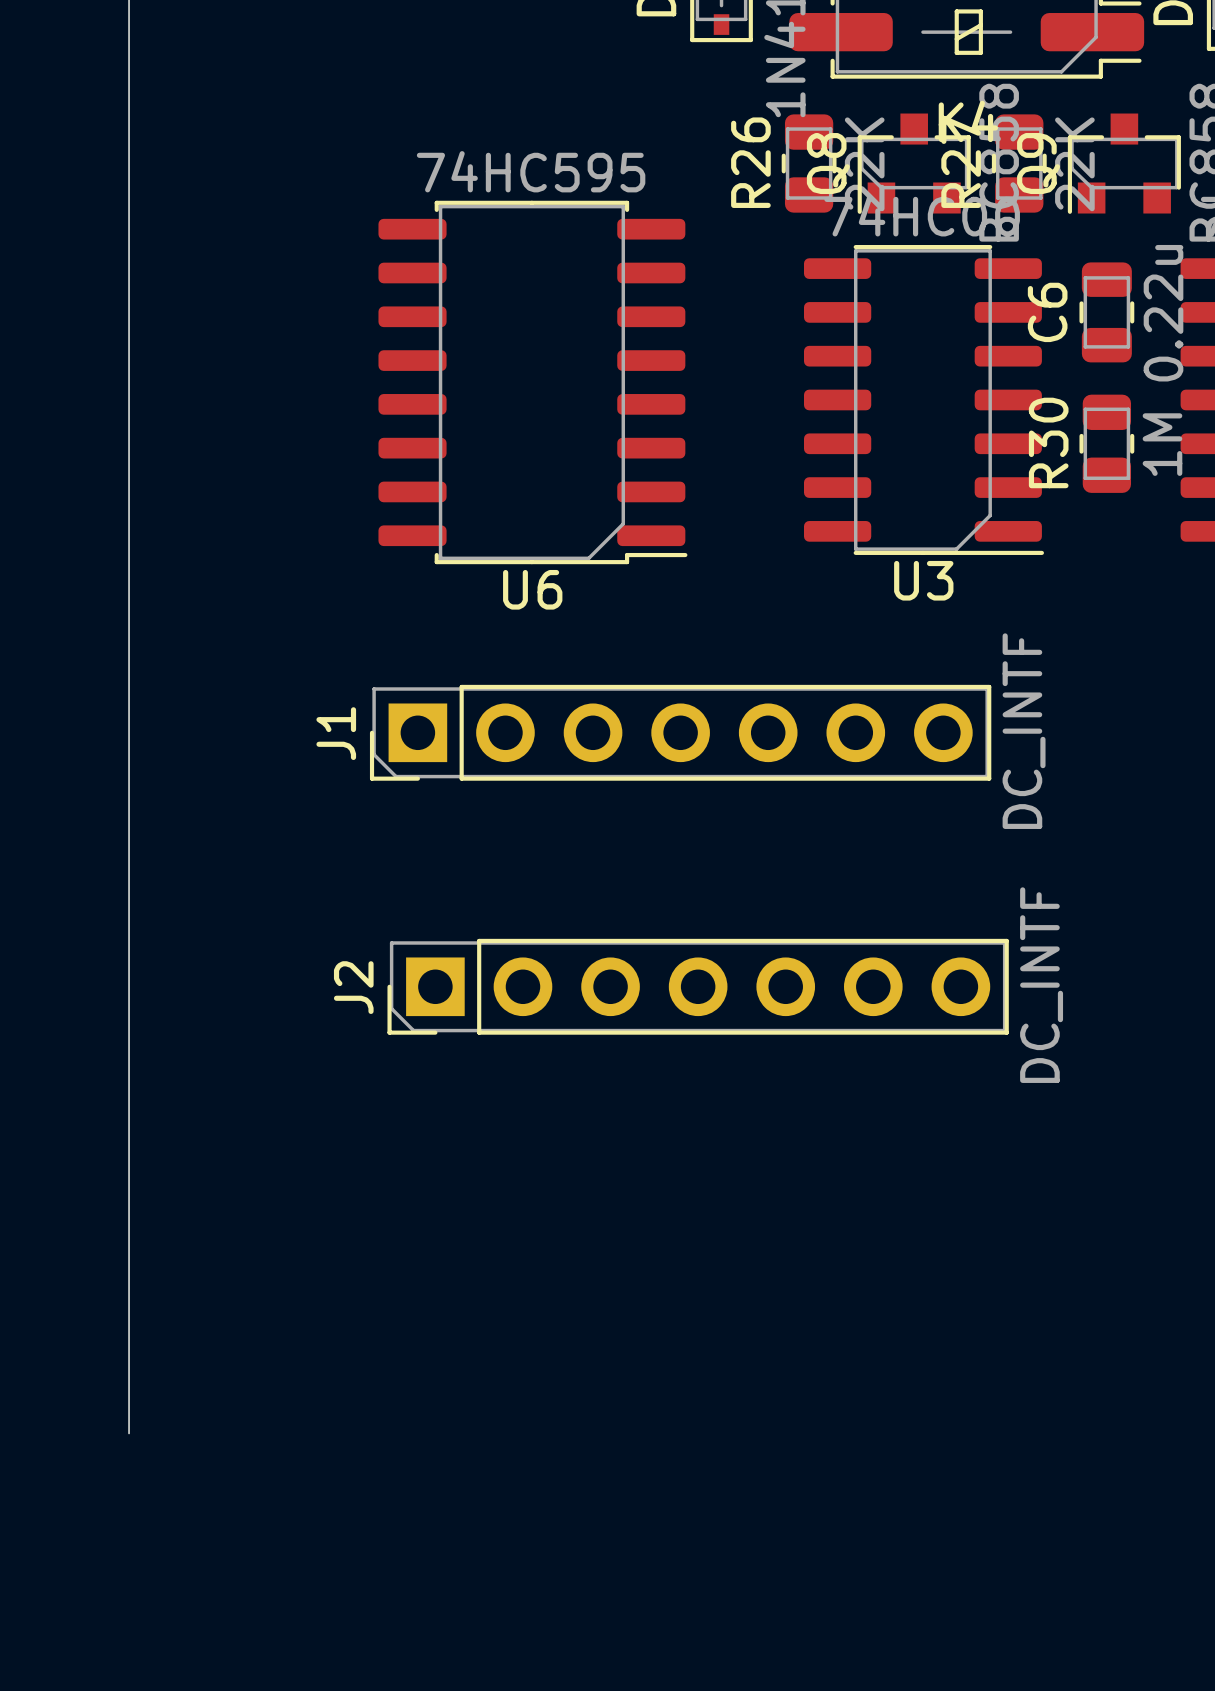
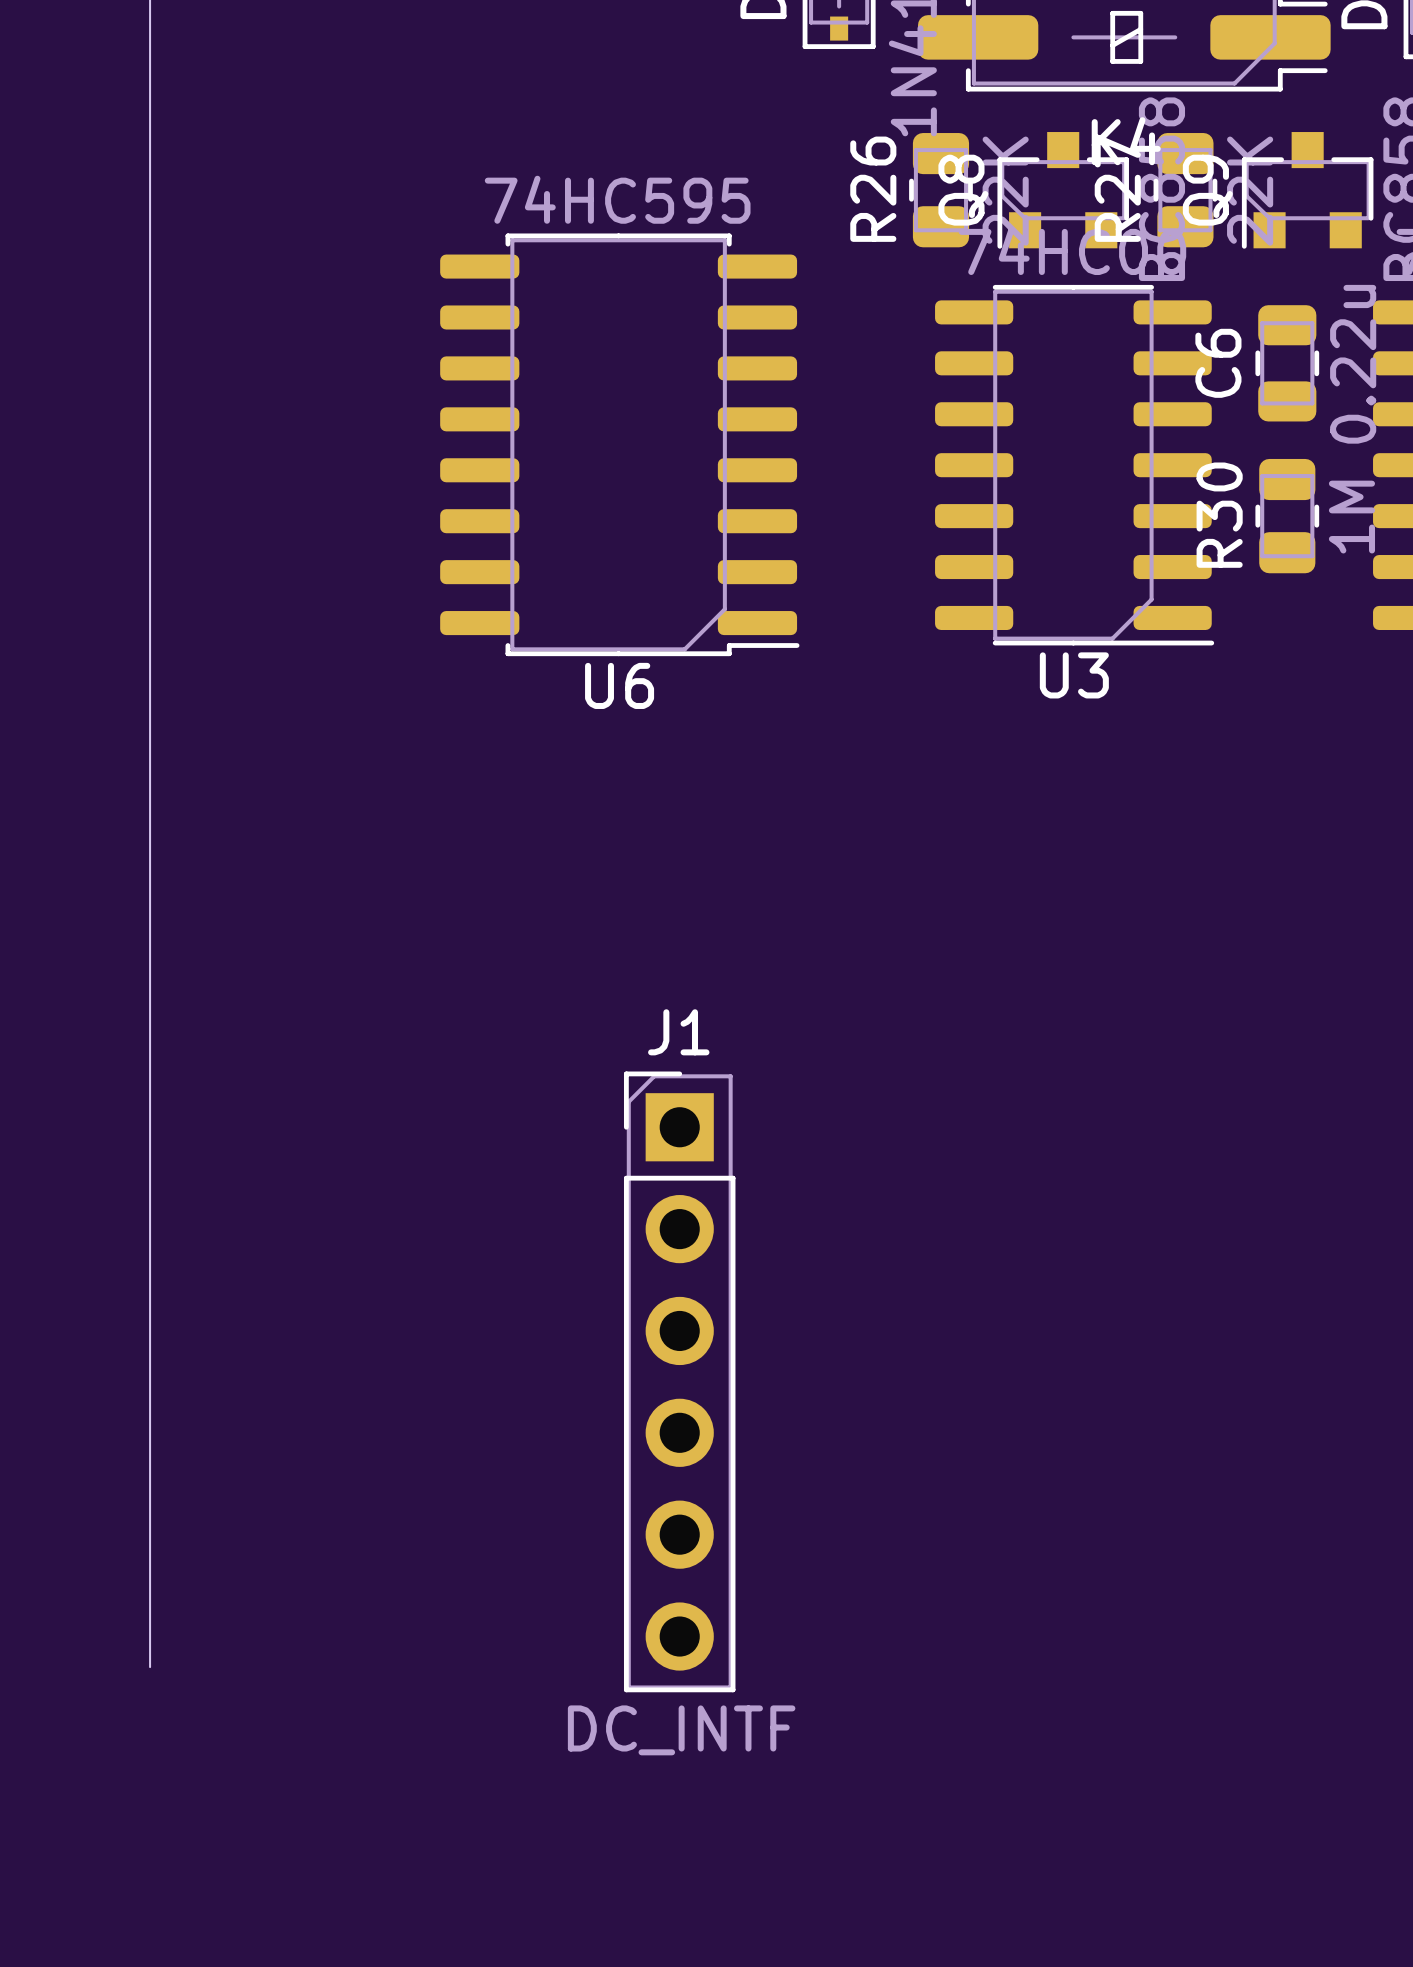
J1 footprint: [369, 684, 992, 781] -> [623, 1071, 736, 1693]
J1 value position: DC_INTF (1024, 731) -> DC_INTF (681, 1730)
J1 name position: J1 (336, 733) -> J1 (678, 1032)
J2: DC_INTF (698, 986) -> none

